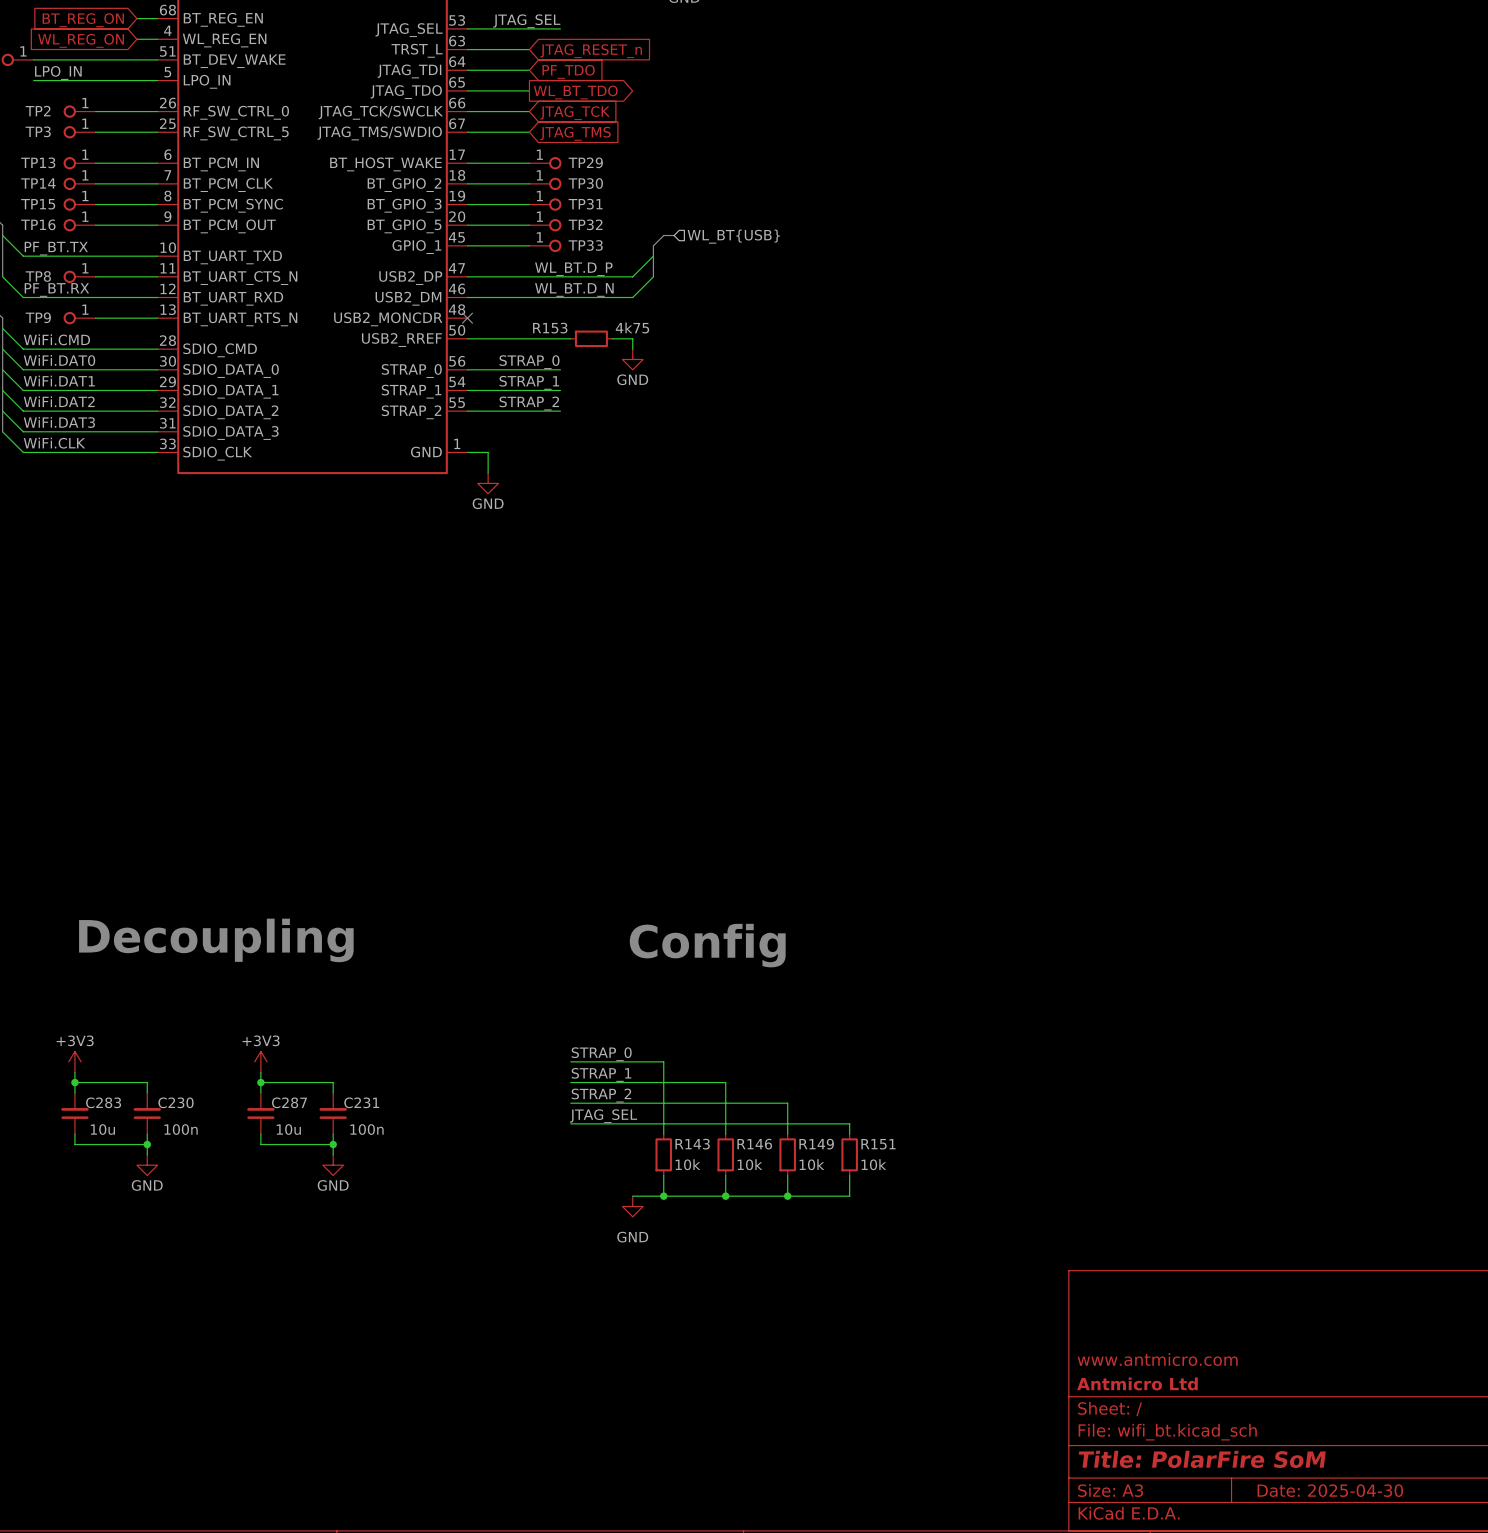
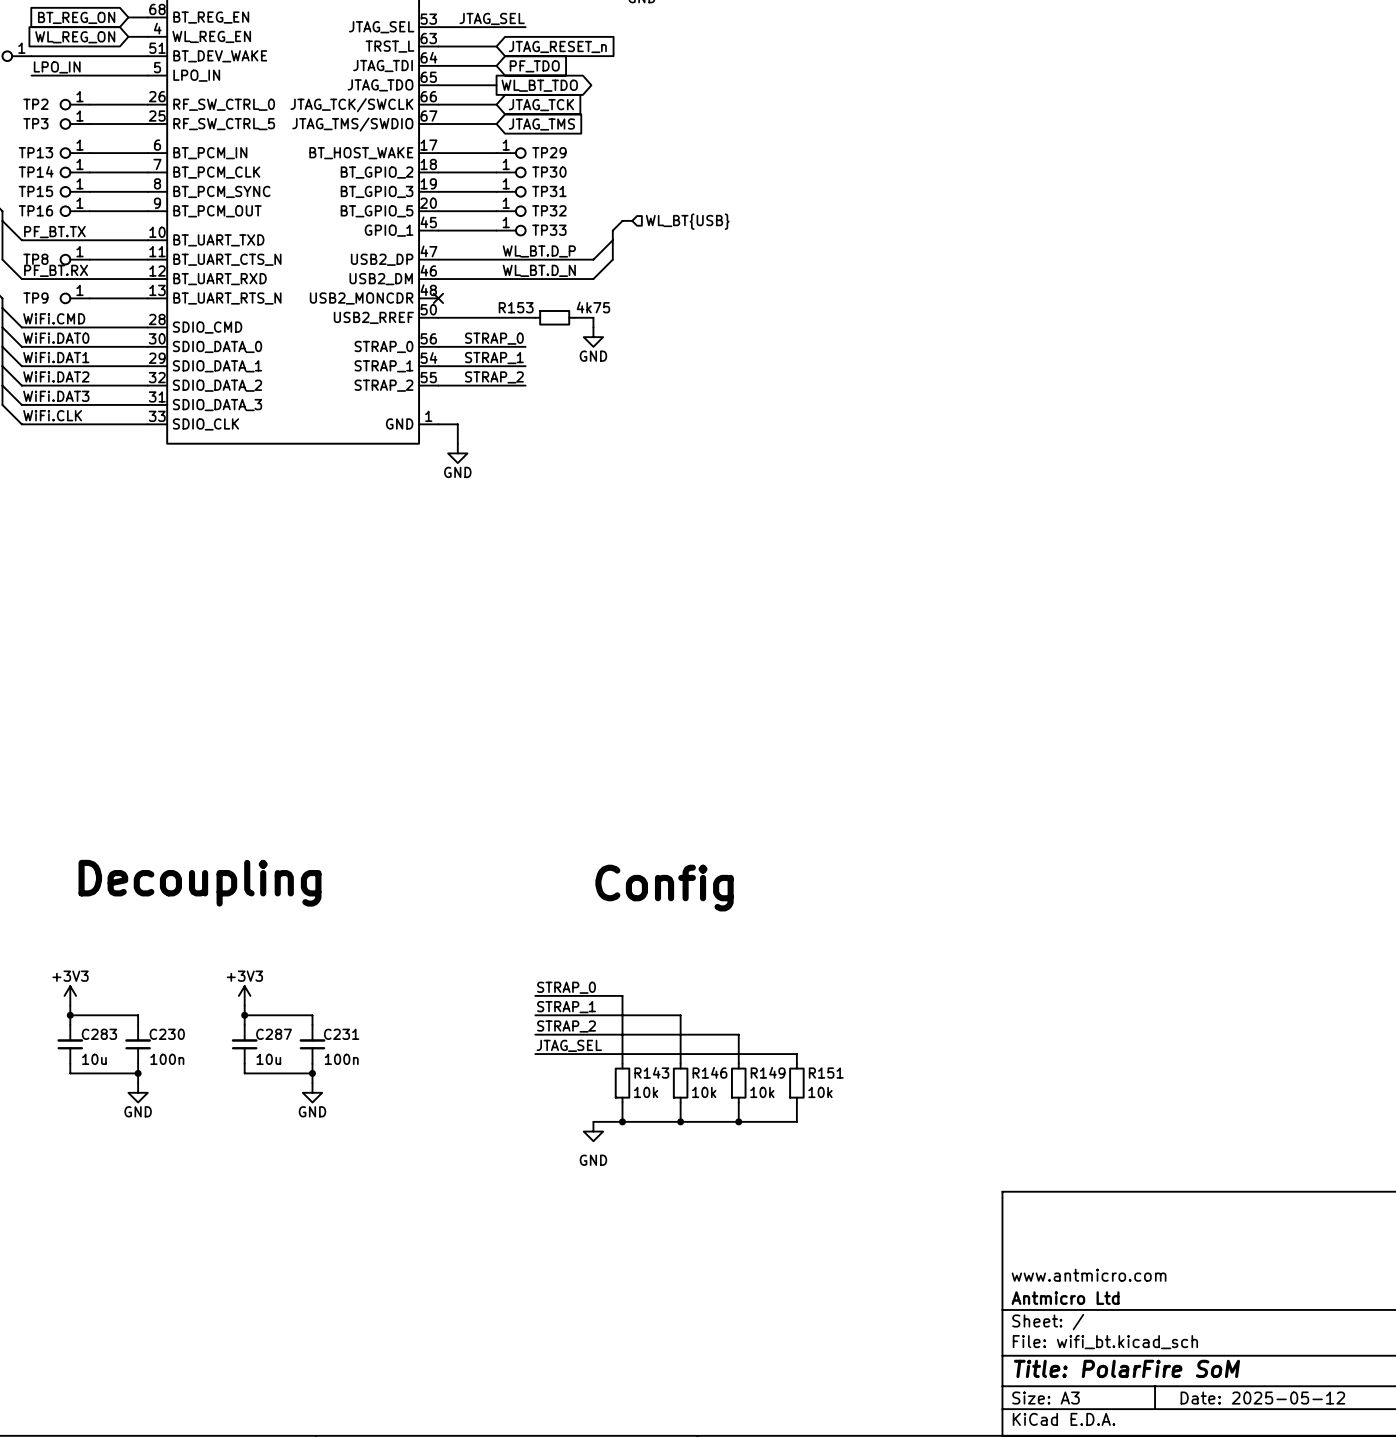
title block: Date: 2025-04-30 (1330, 1490) -> Date: 2025-05-12 (1262, 1398)

